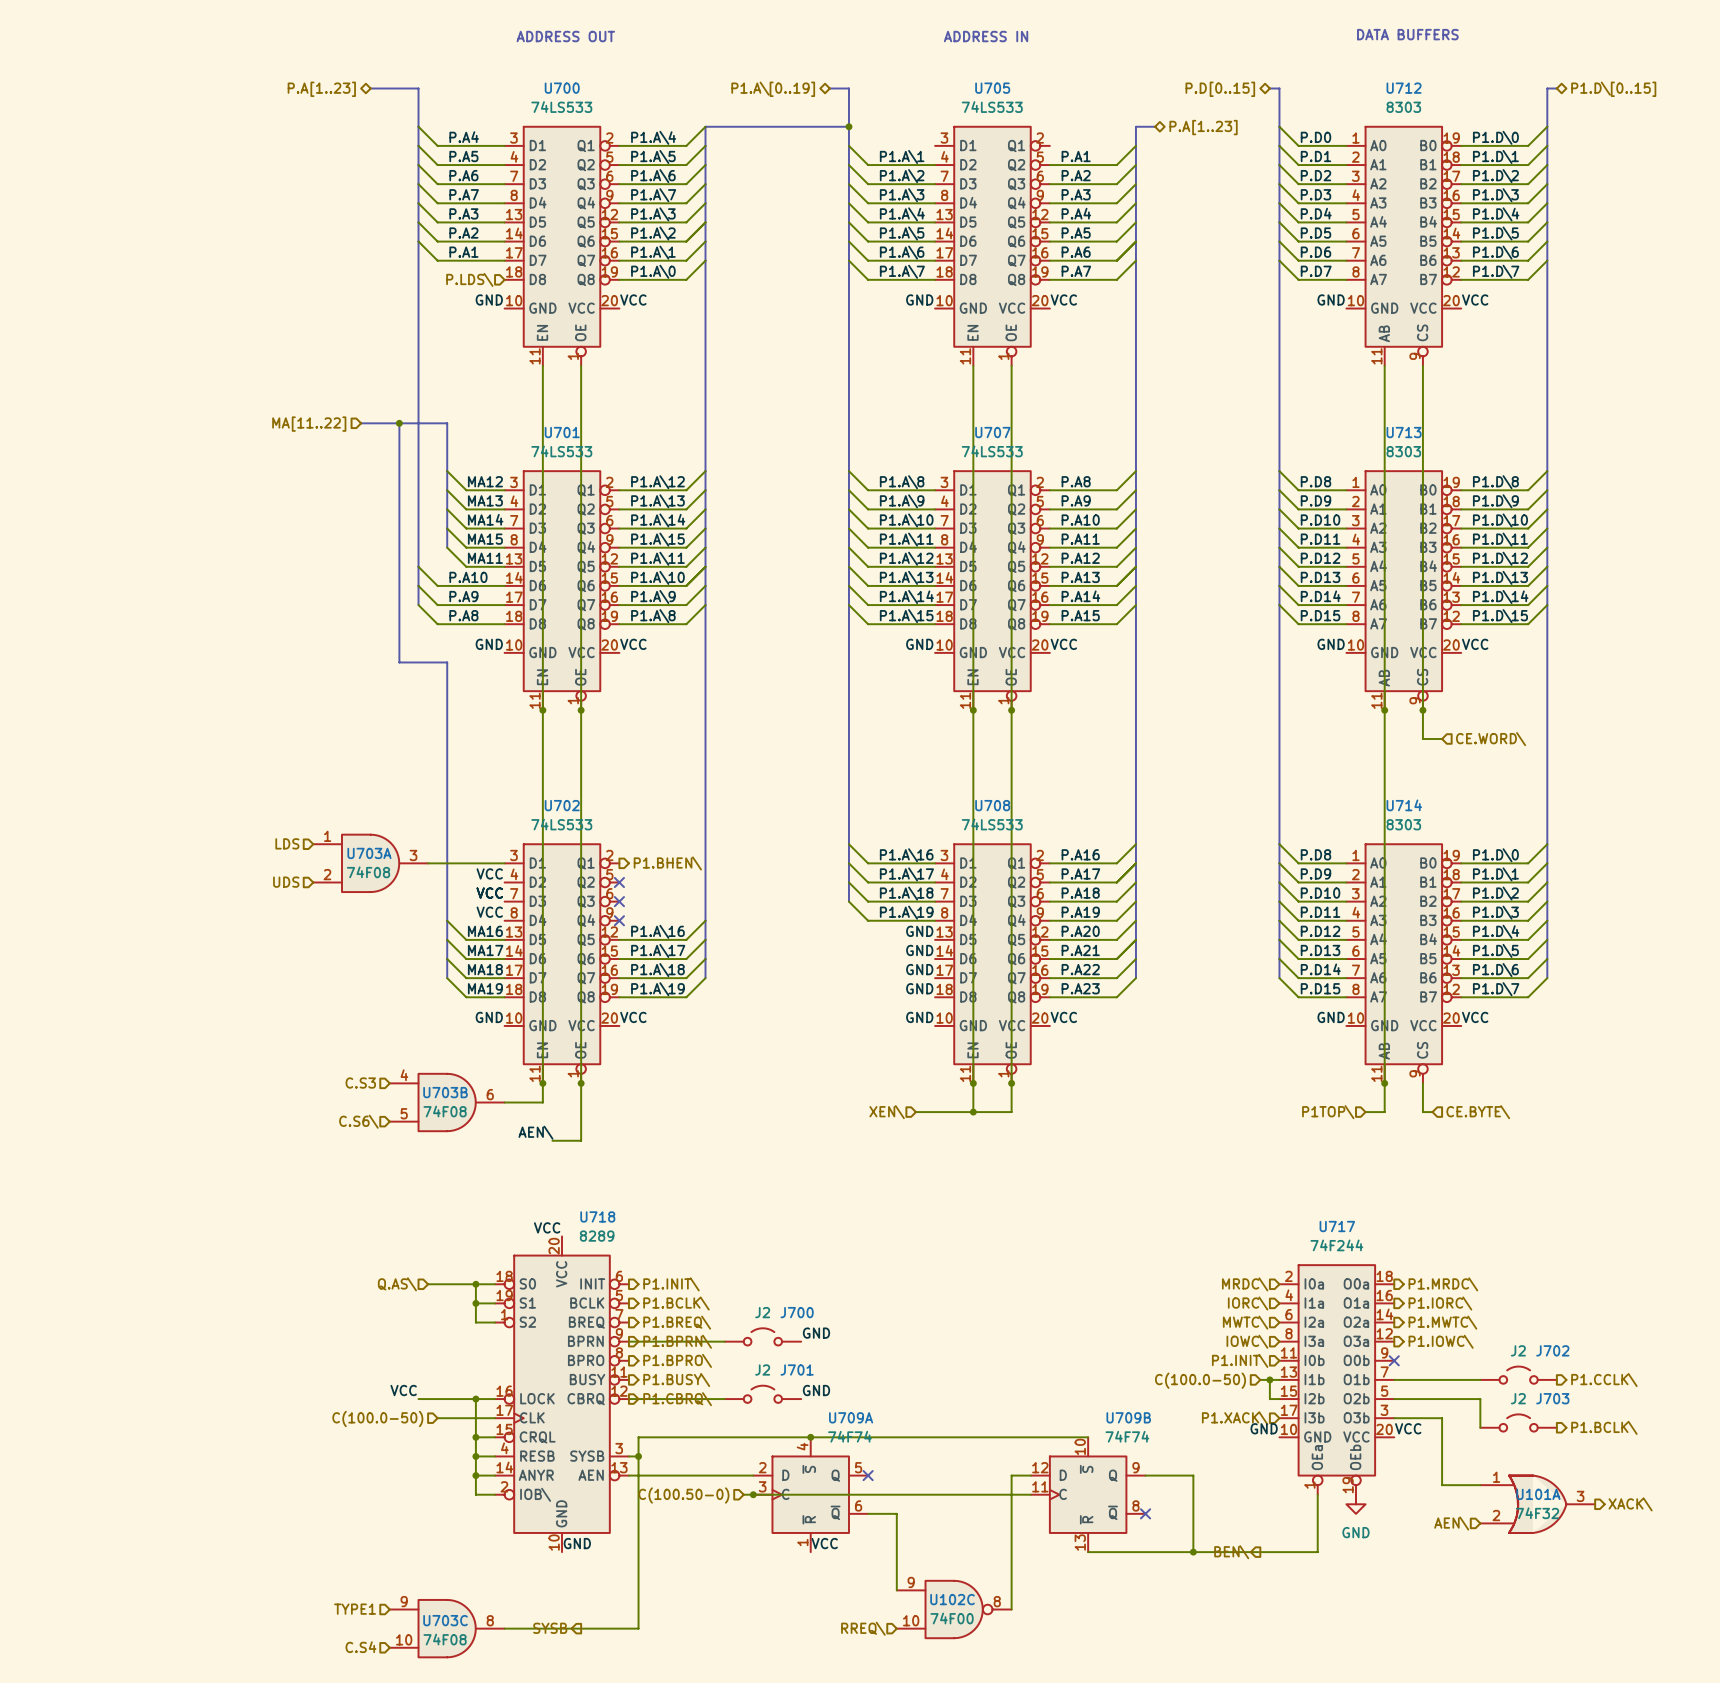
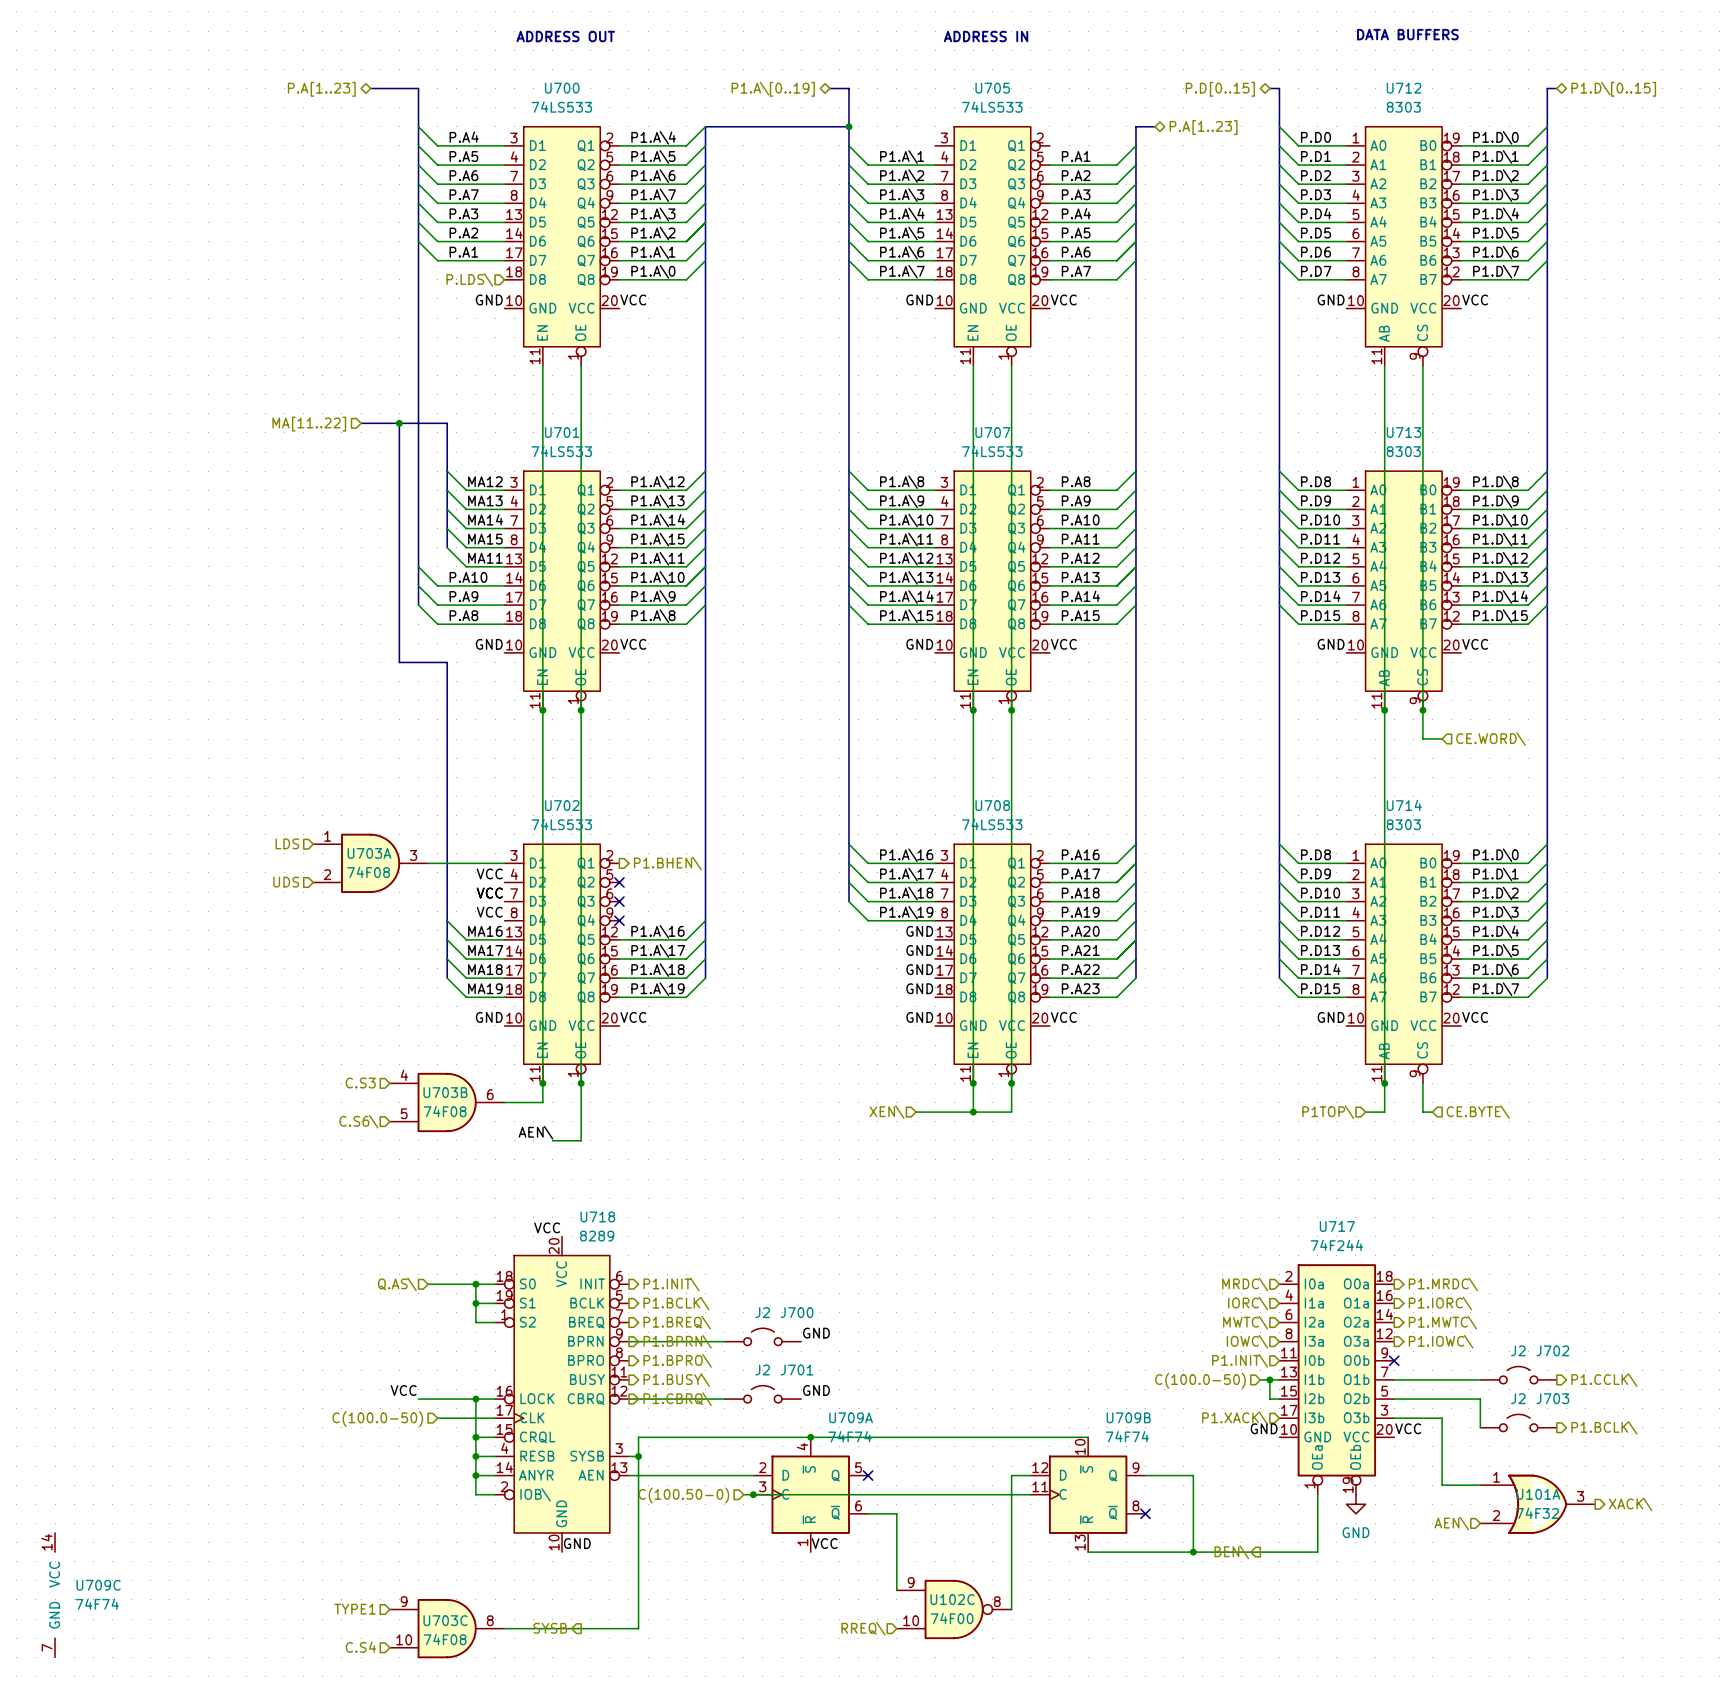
U709C: none -> 74F74 (55, 1595)

